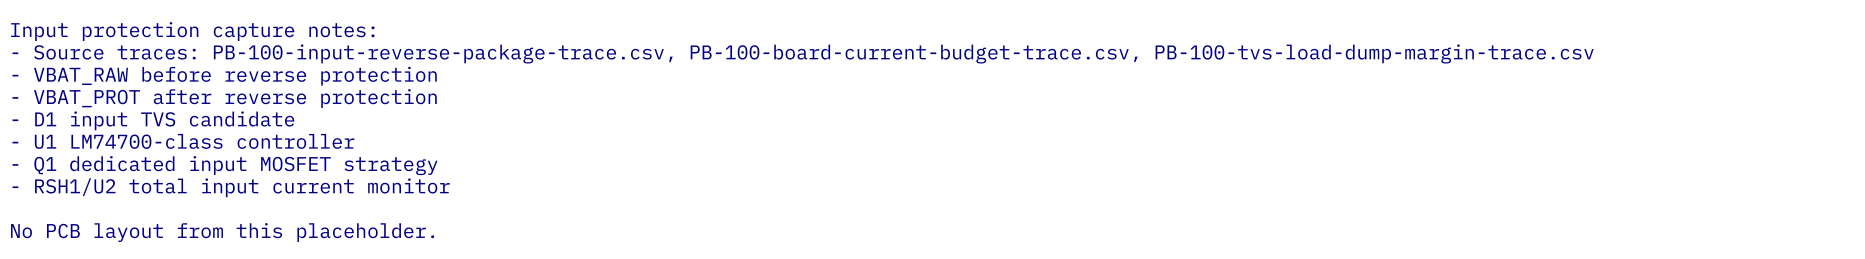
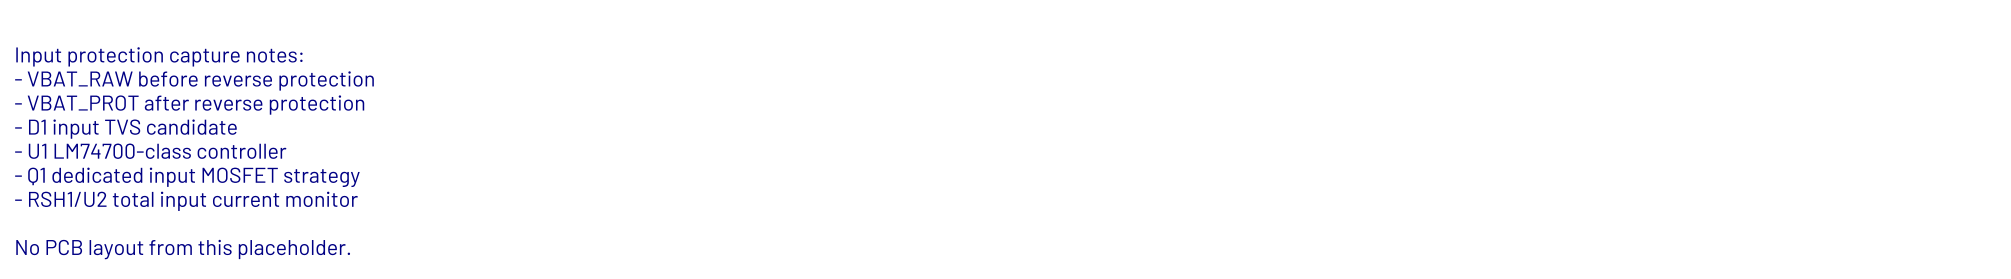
text: Input protection capture notes: (192, 31) -> none
text: - Source traces: PB-100-input-reverse-package-trace.csv, PB-100-board-current-budget-trace.csv, PB-100-tvs-load-dump-margin-trace.csv (803, 54) -> Input protection capture notes: (159, 56)

